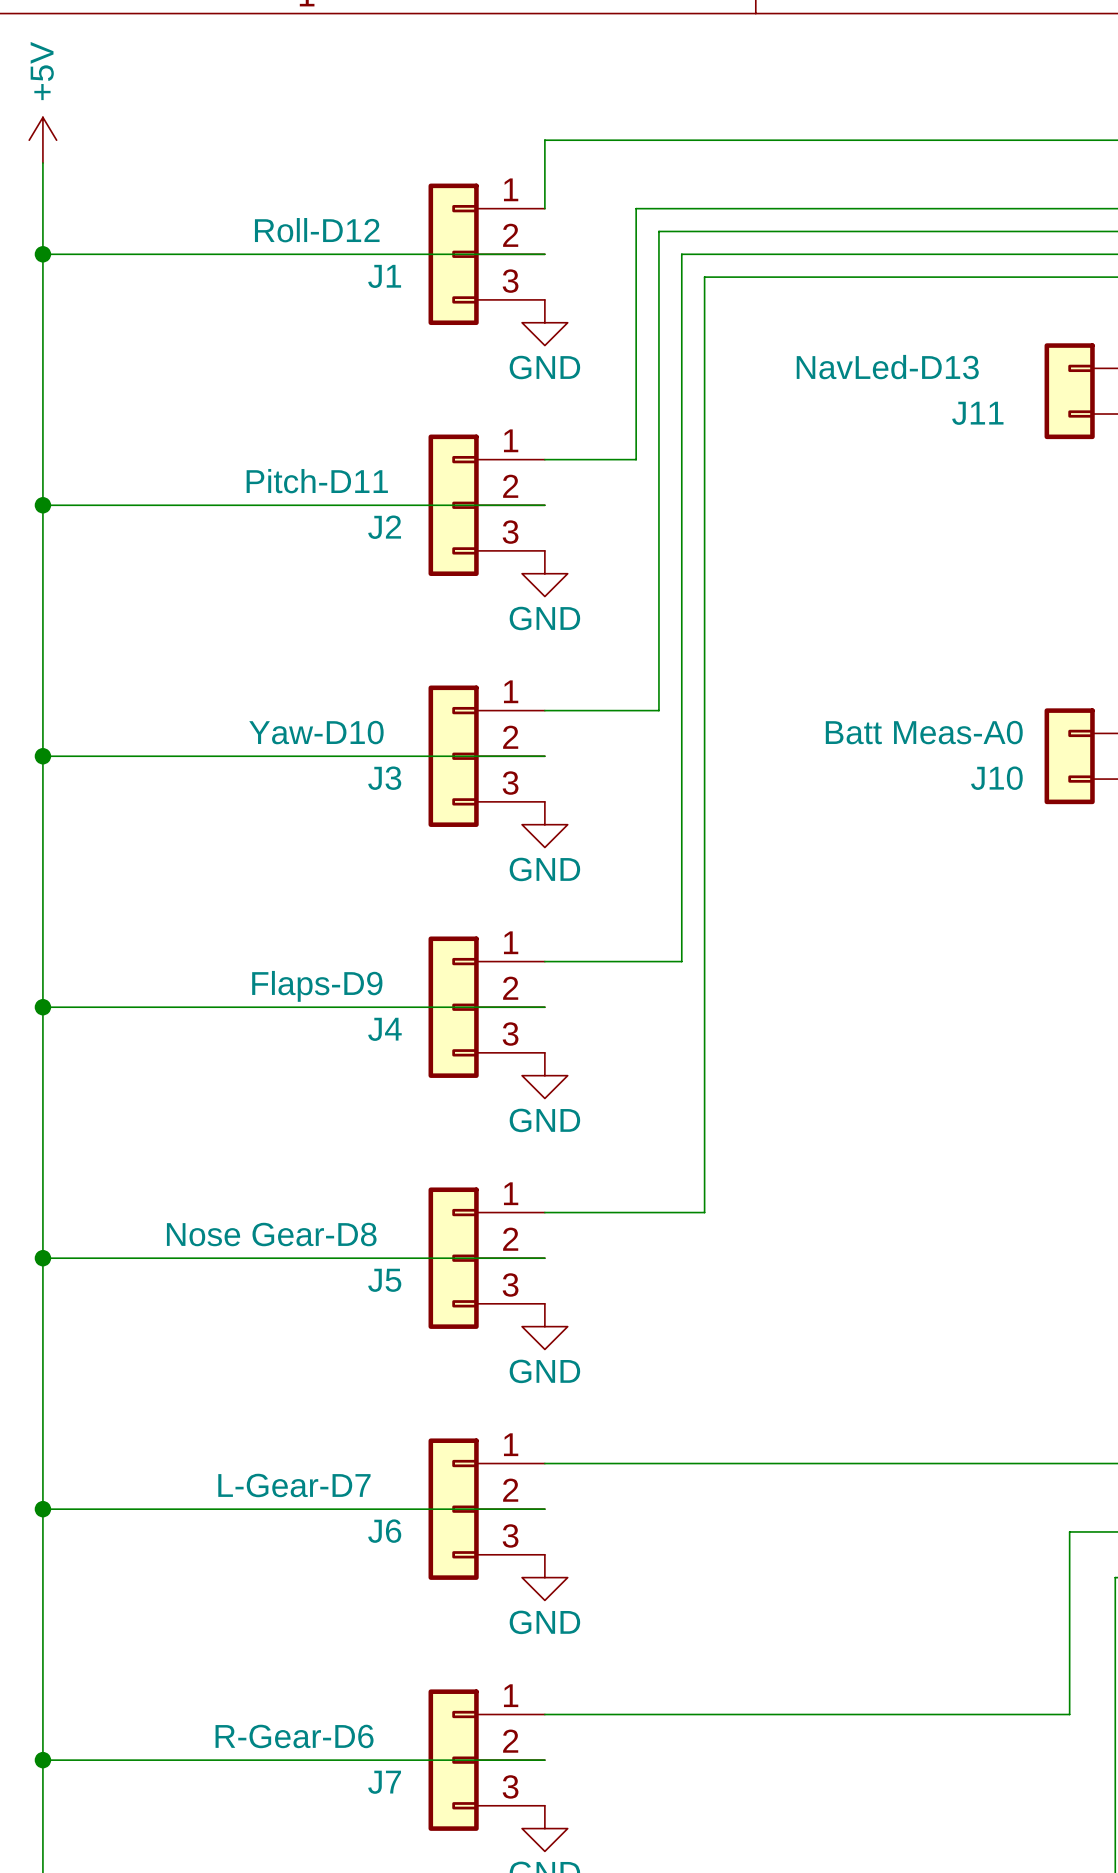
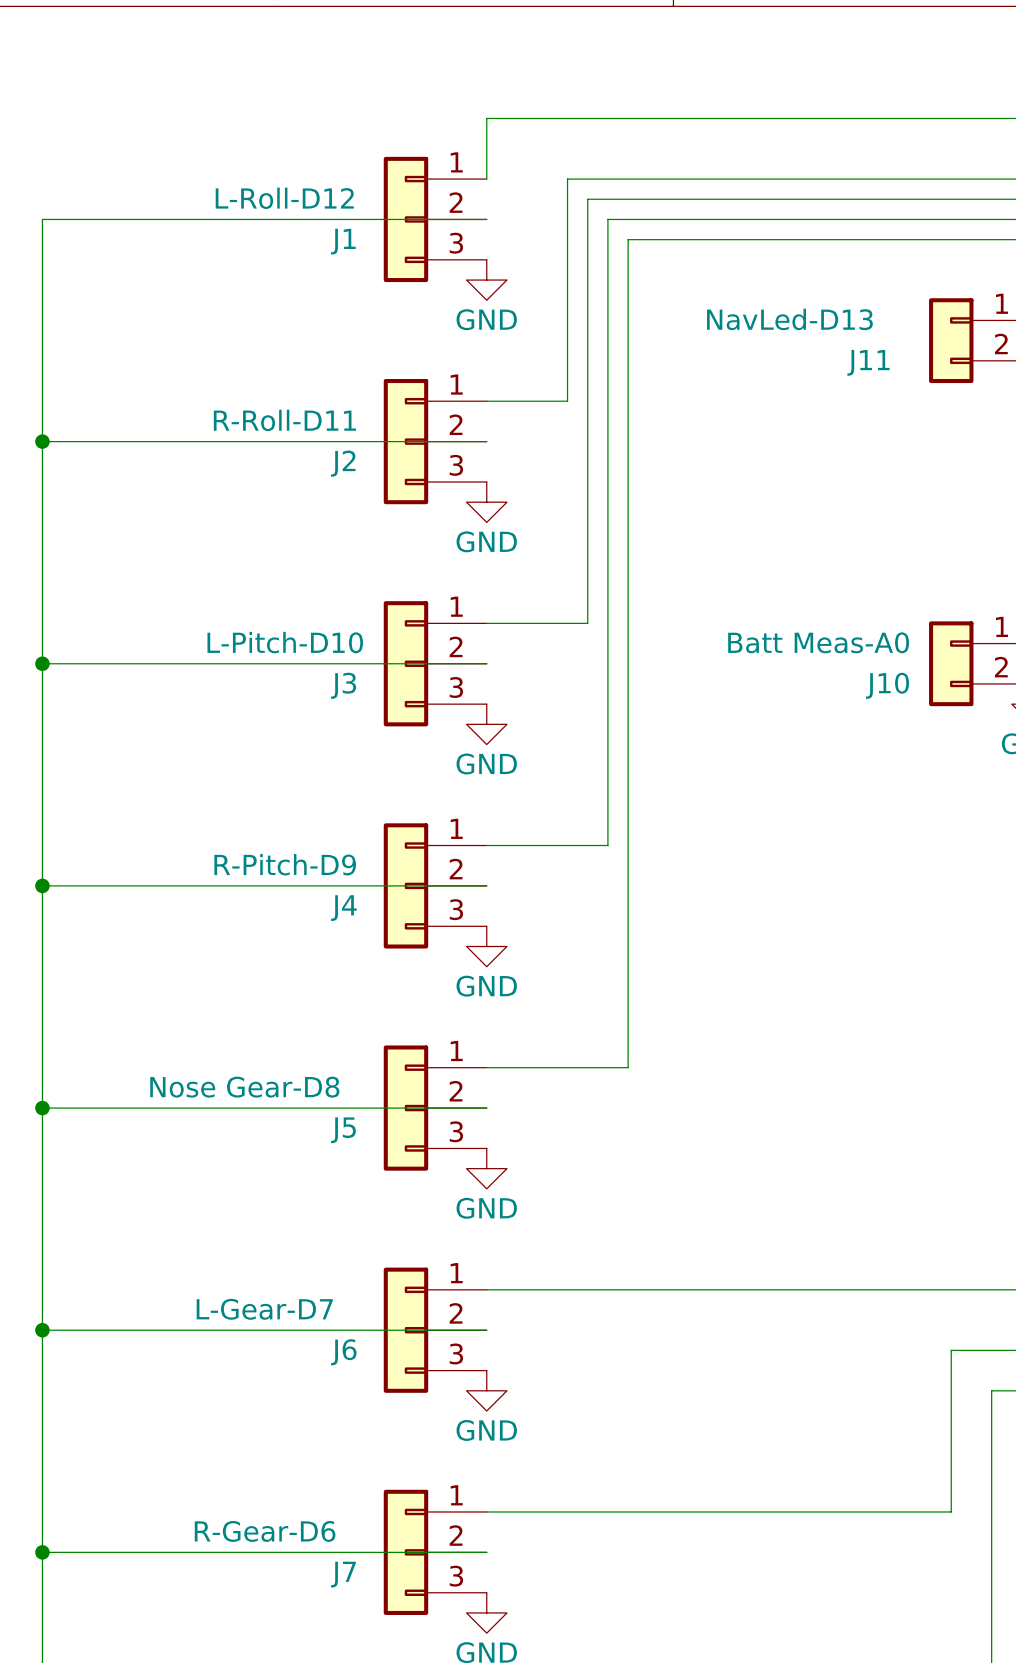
power symbol: +5V (42, 140) -> none
wire: (42, 163) (42, 254) -> none
J1 value: Roll-D12 (317, 230) -> L-Roll-D12 (284, 198)
junction: (42, 254) -> none
J2 value: Pitch-D11 (317, 481) -> R-Roll-D11 (284, 420)
J3 value: Yaw-D10 (316, 732) -> L-Pitch-D10 (285, 642)
J4 value: Flaps-D9 (317, 986) -> R-Pitch-D9 (285, 864)

